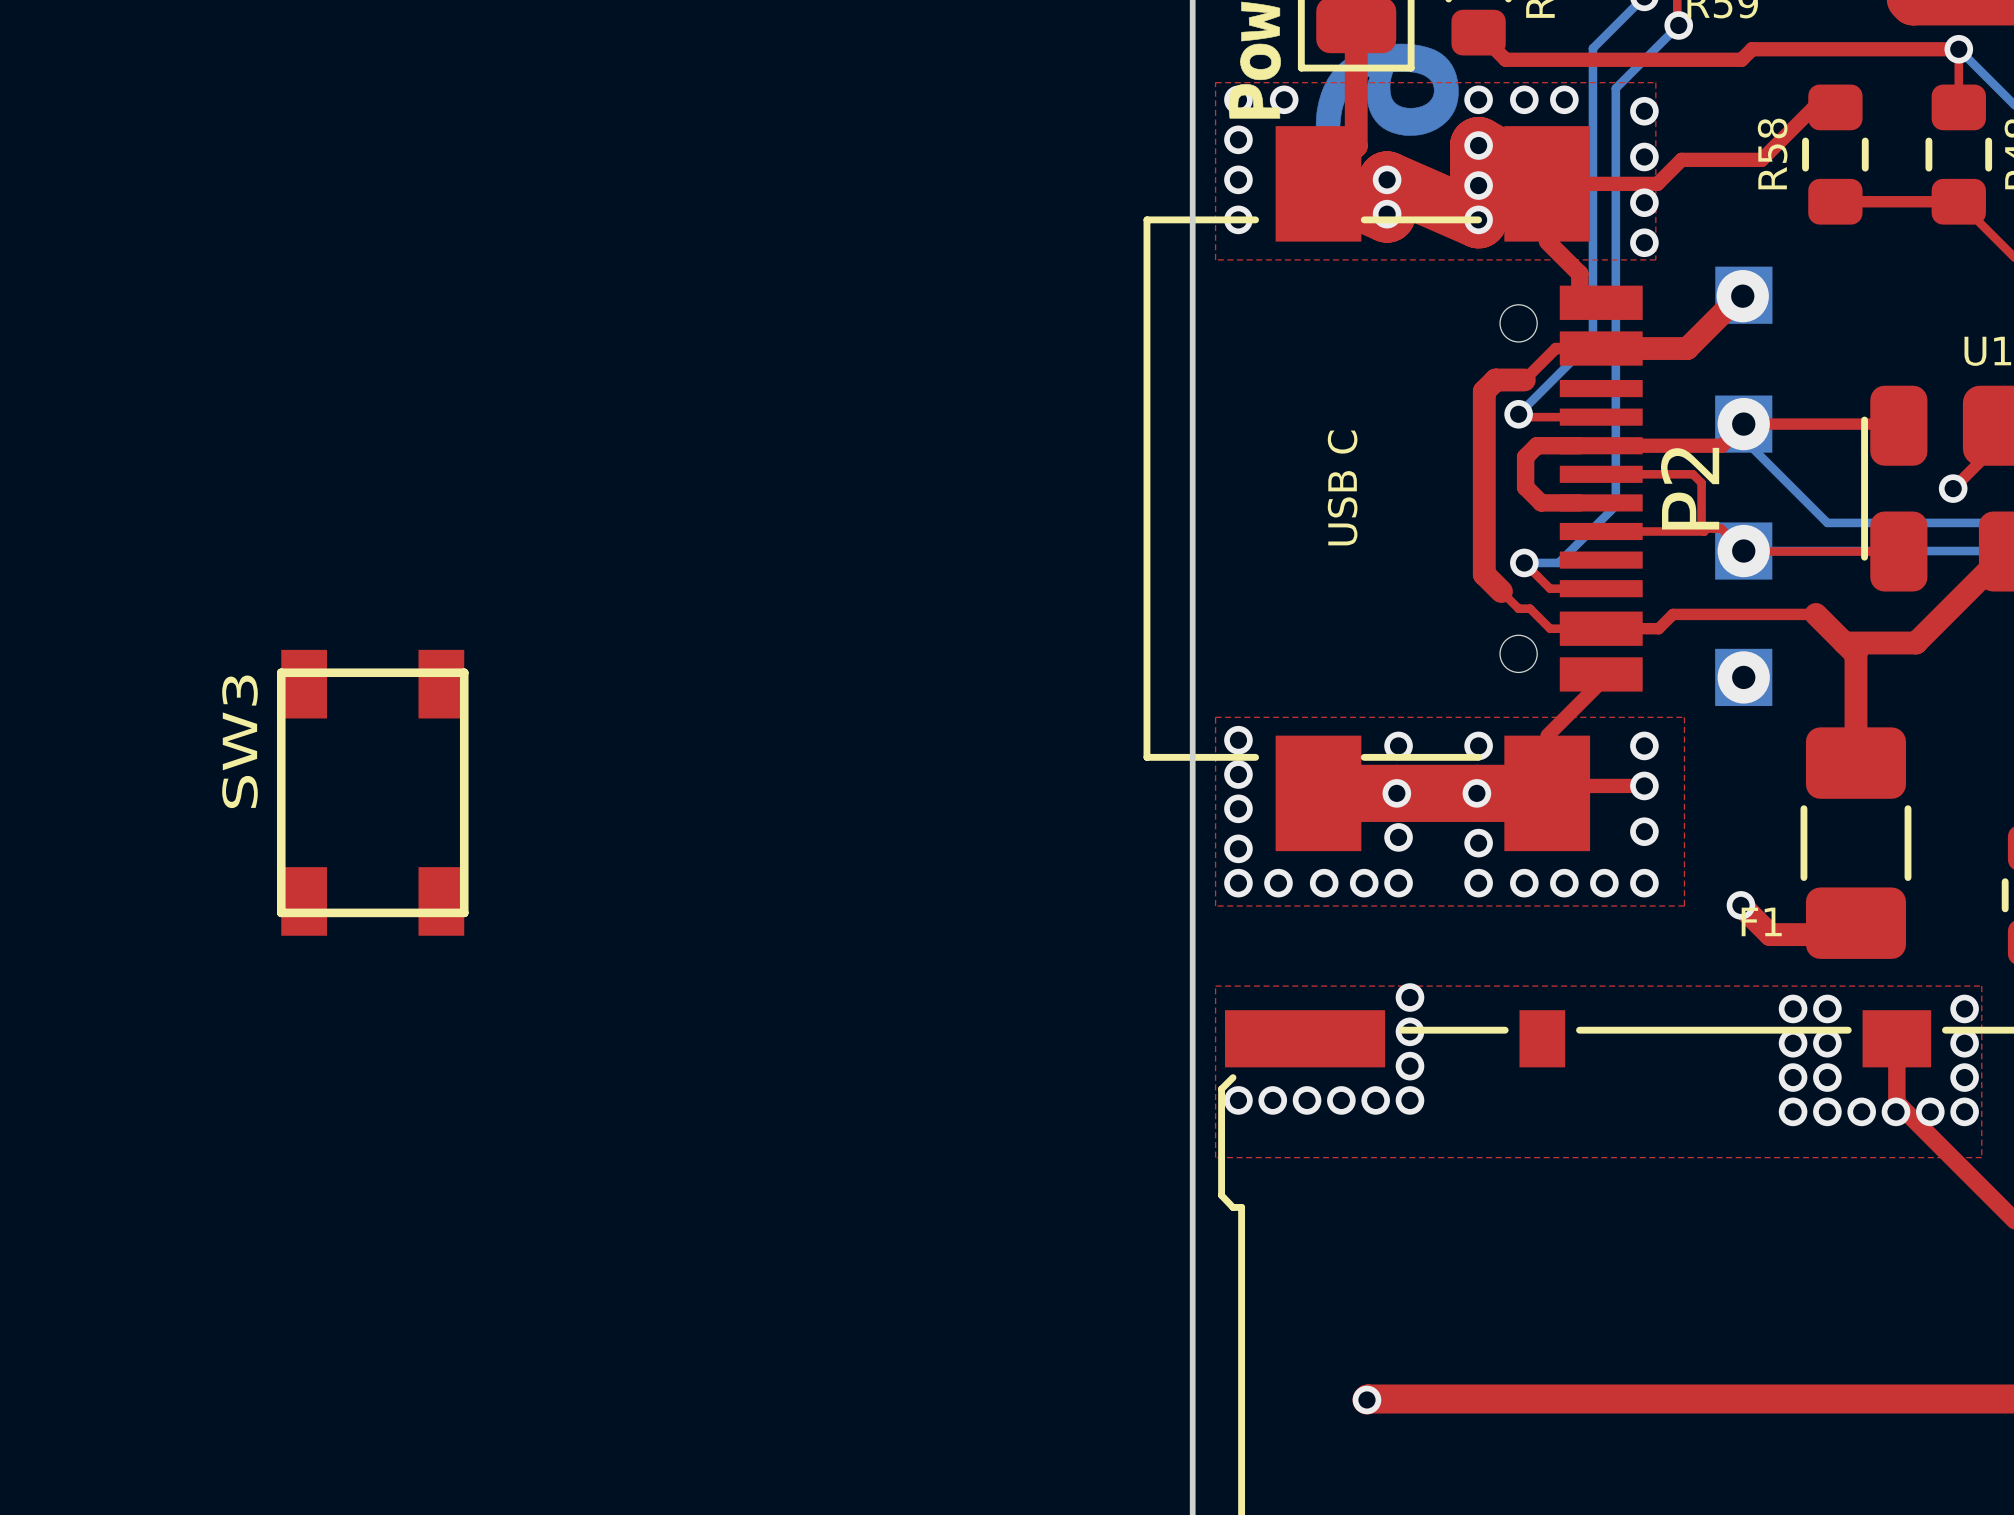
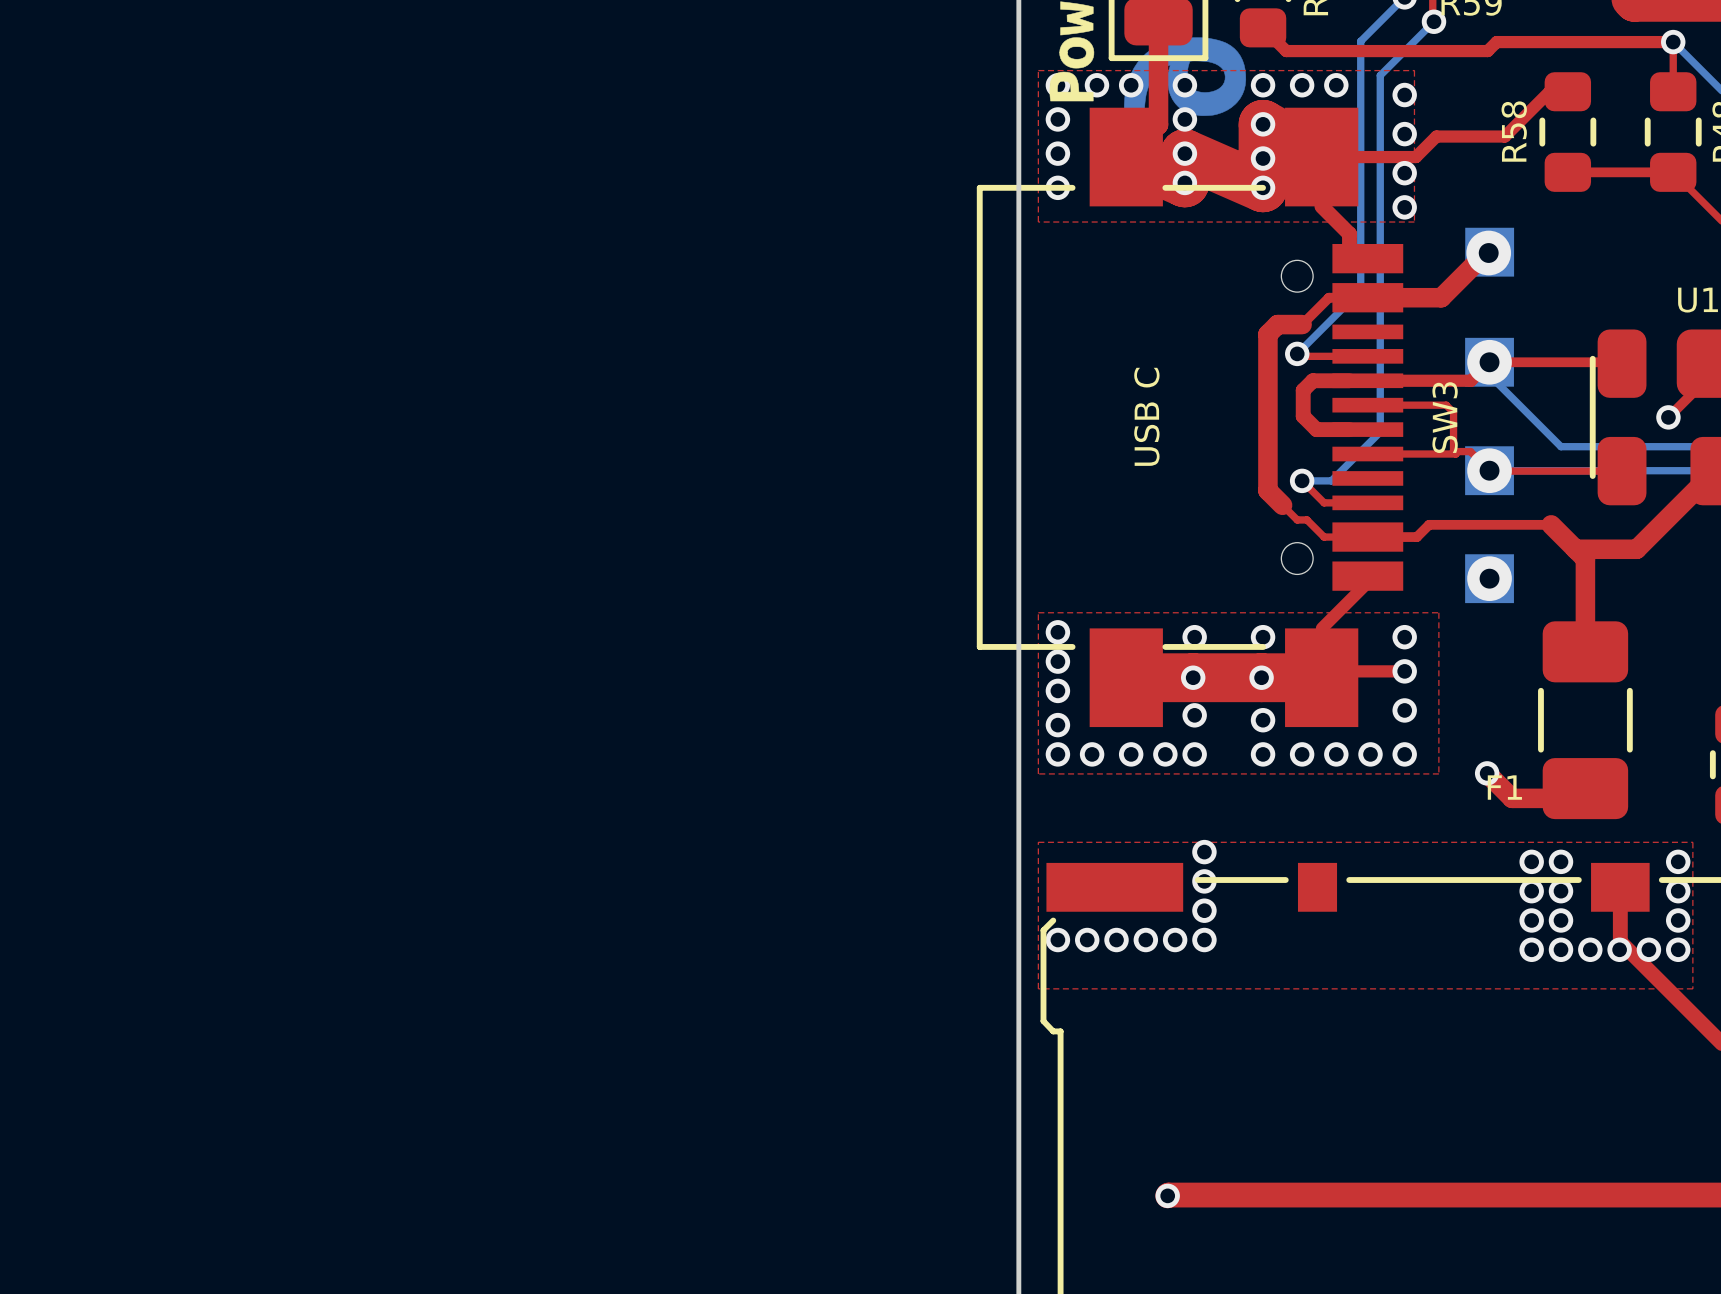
via: none -> (1131, 85)
via: none -> (1184, 85)
via: none -> (1184, 119)
P2 name: P2 (1690, 488) -> SW3 (1445, 417)
SW3: (372, 792) -> none

